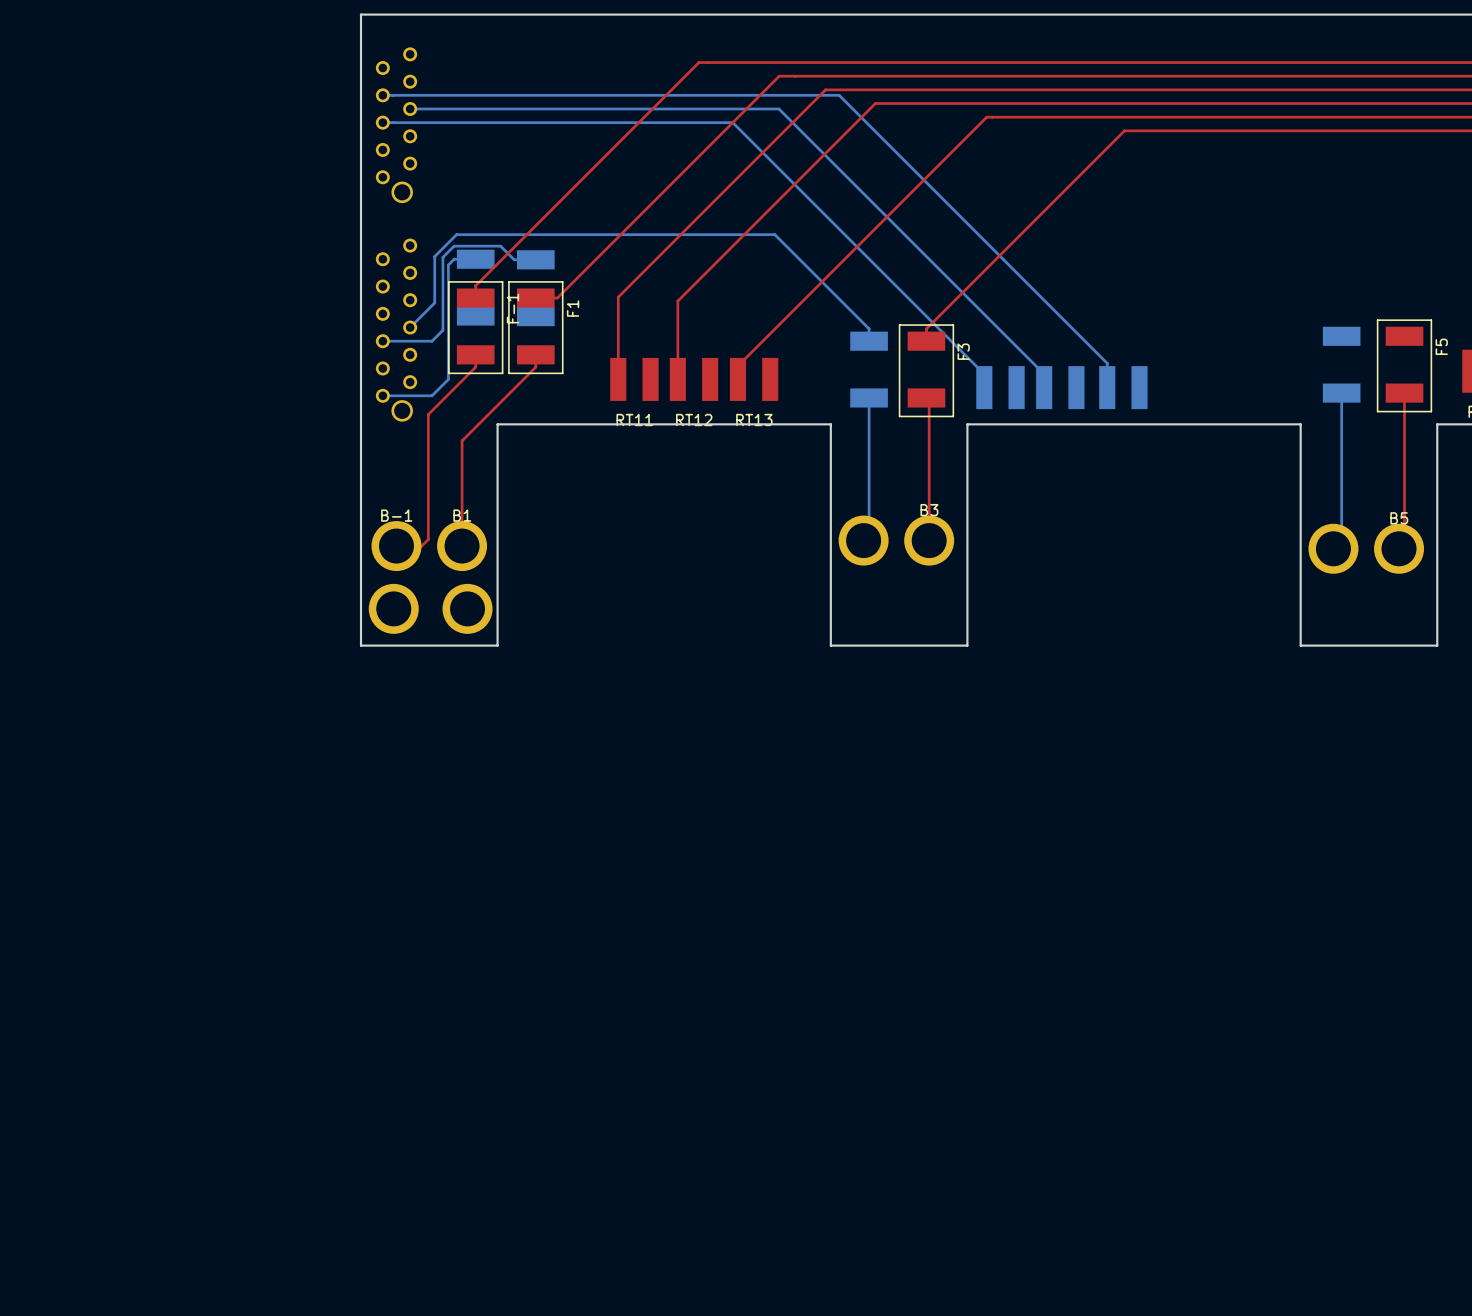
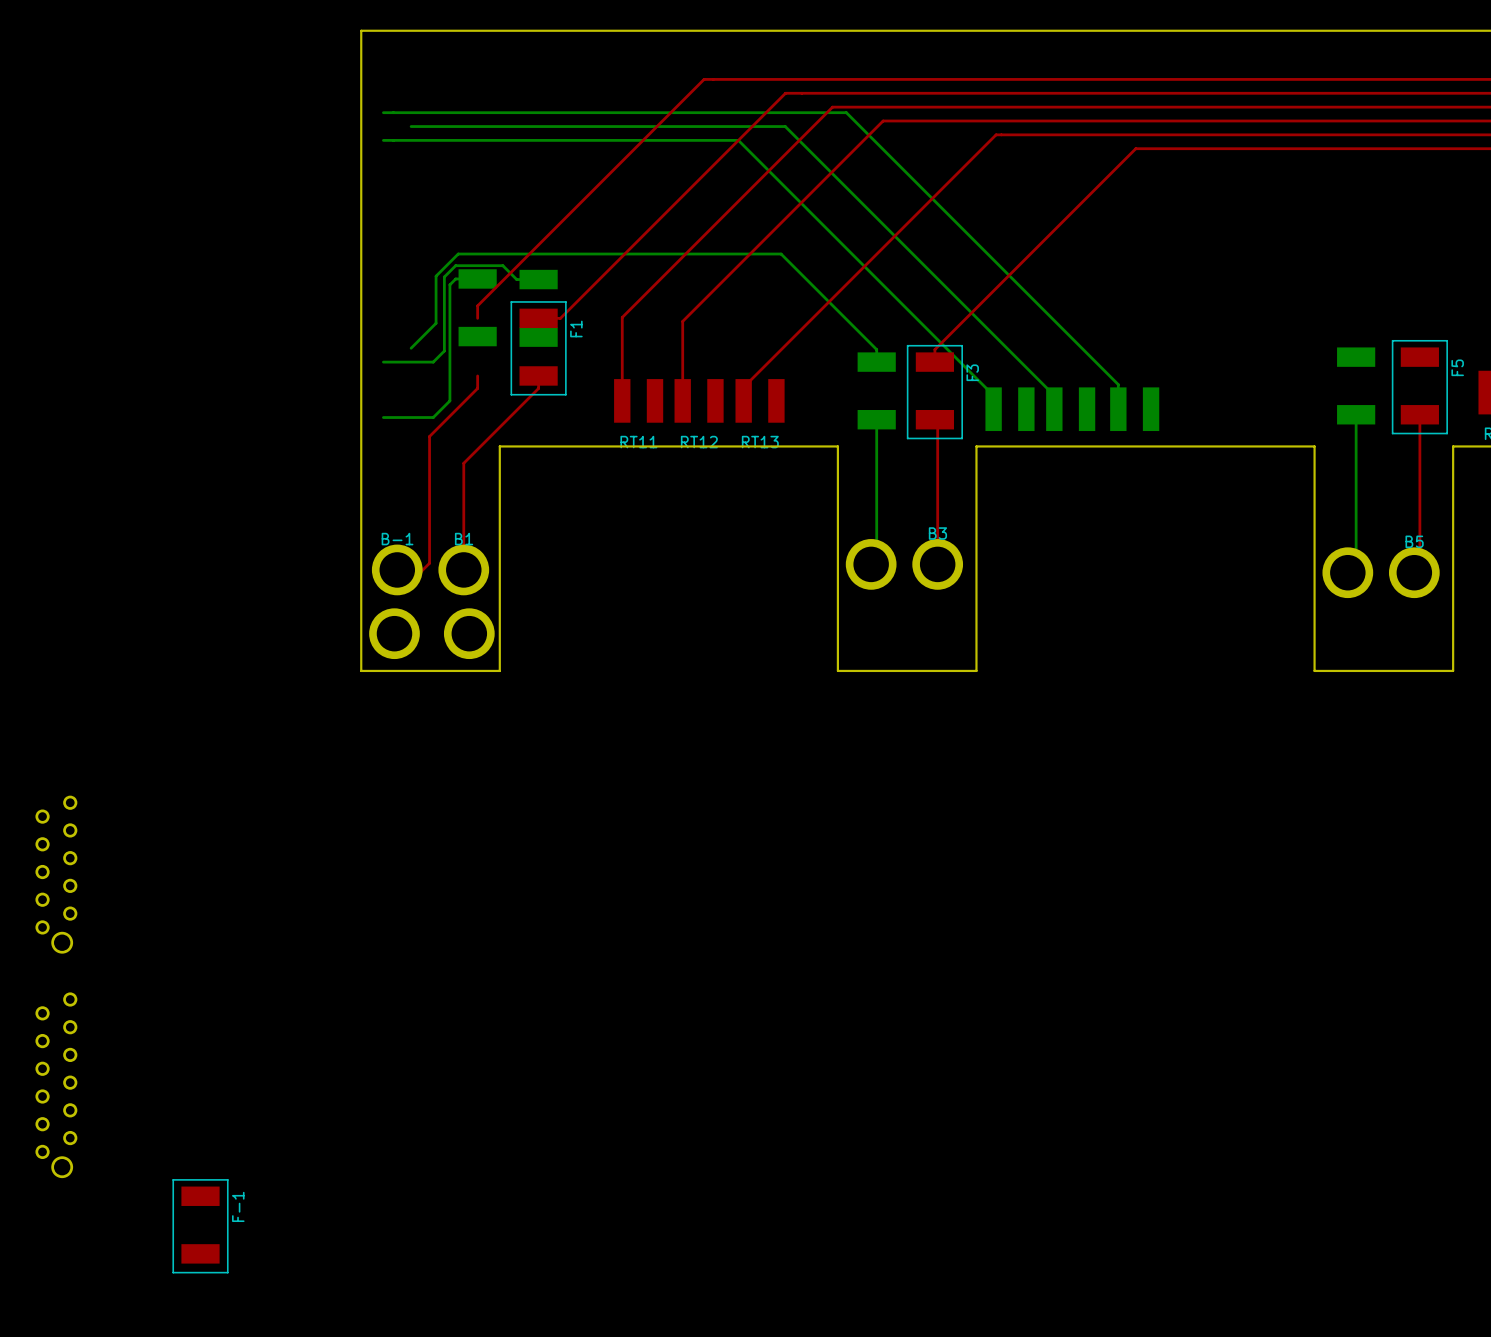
part: (396, 125) -> none
F-1 position: (475, 327) -> (200, 1226)
part: (396, 330) -> none
part: none -> (56, 874)
part: none -> (56, 1085)

